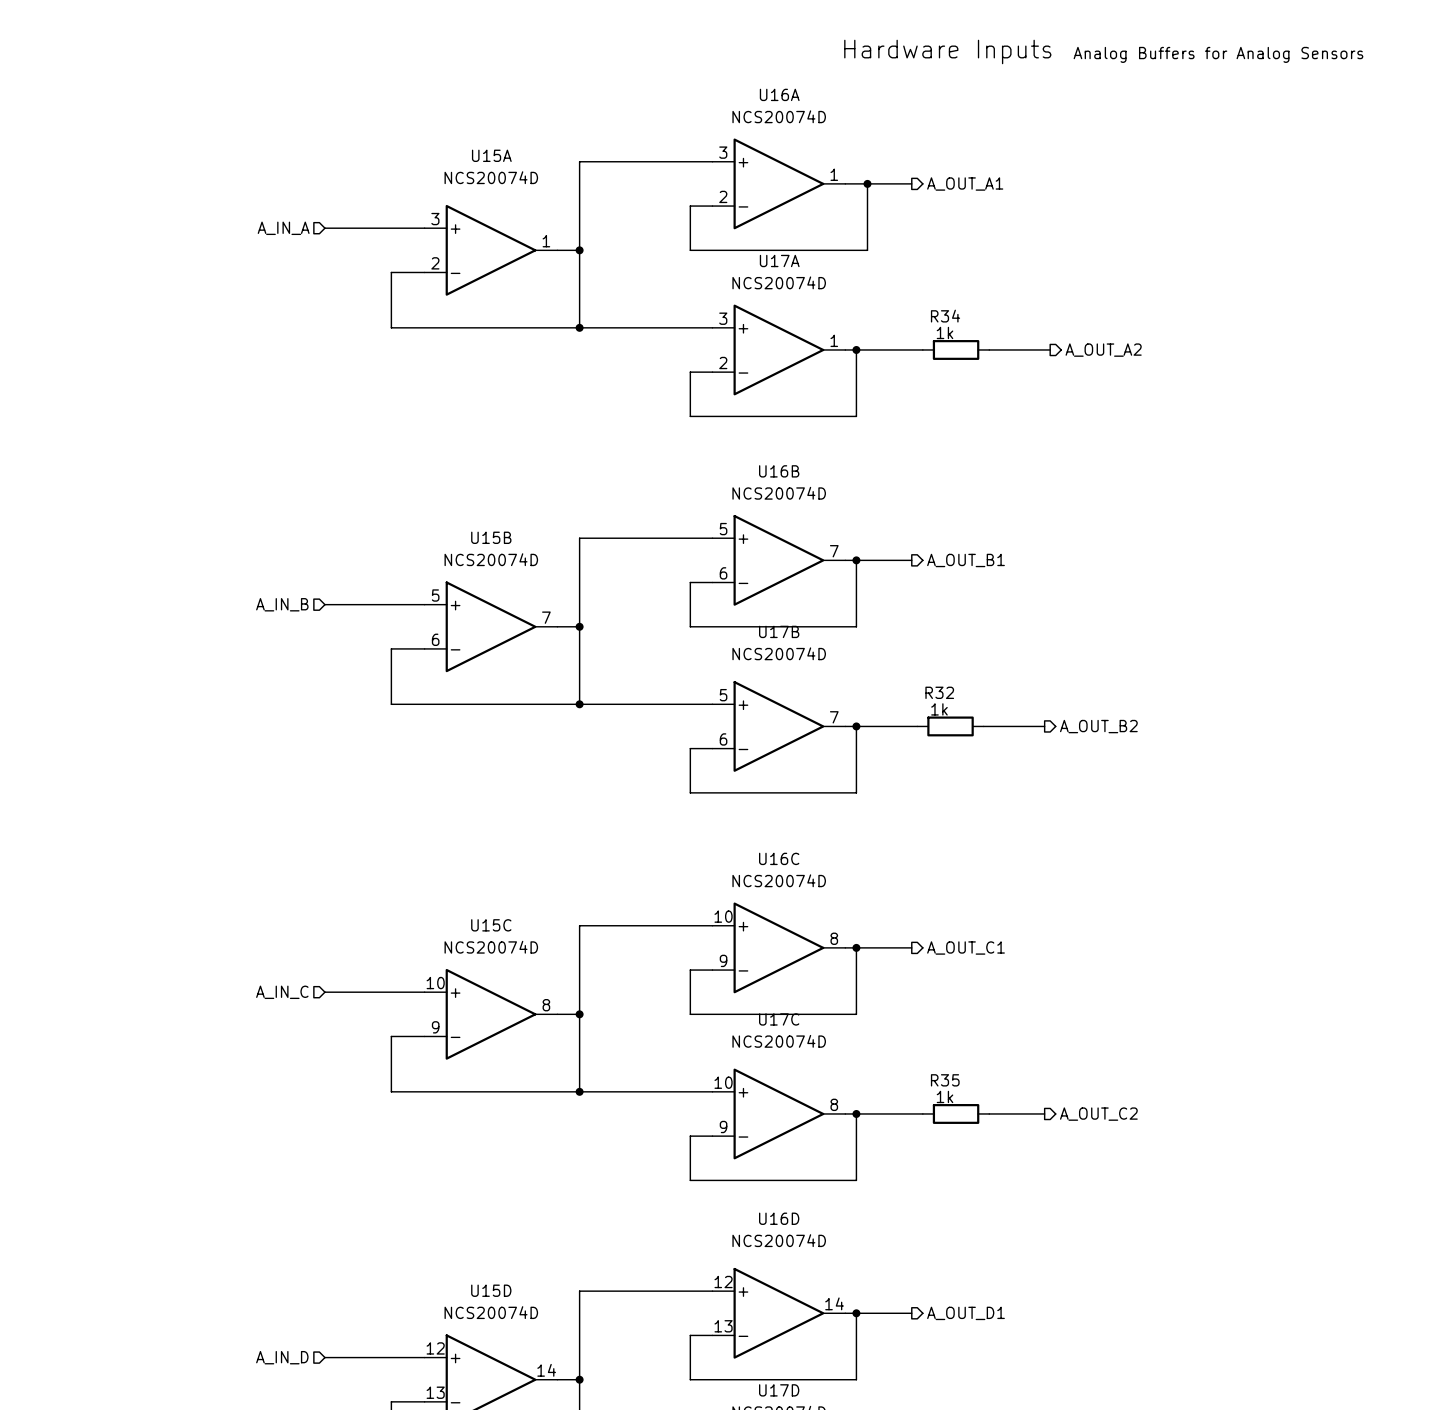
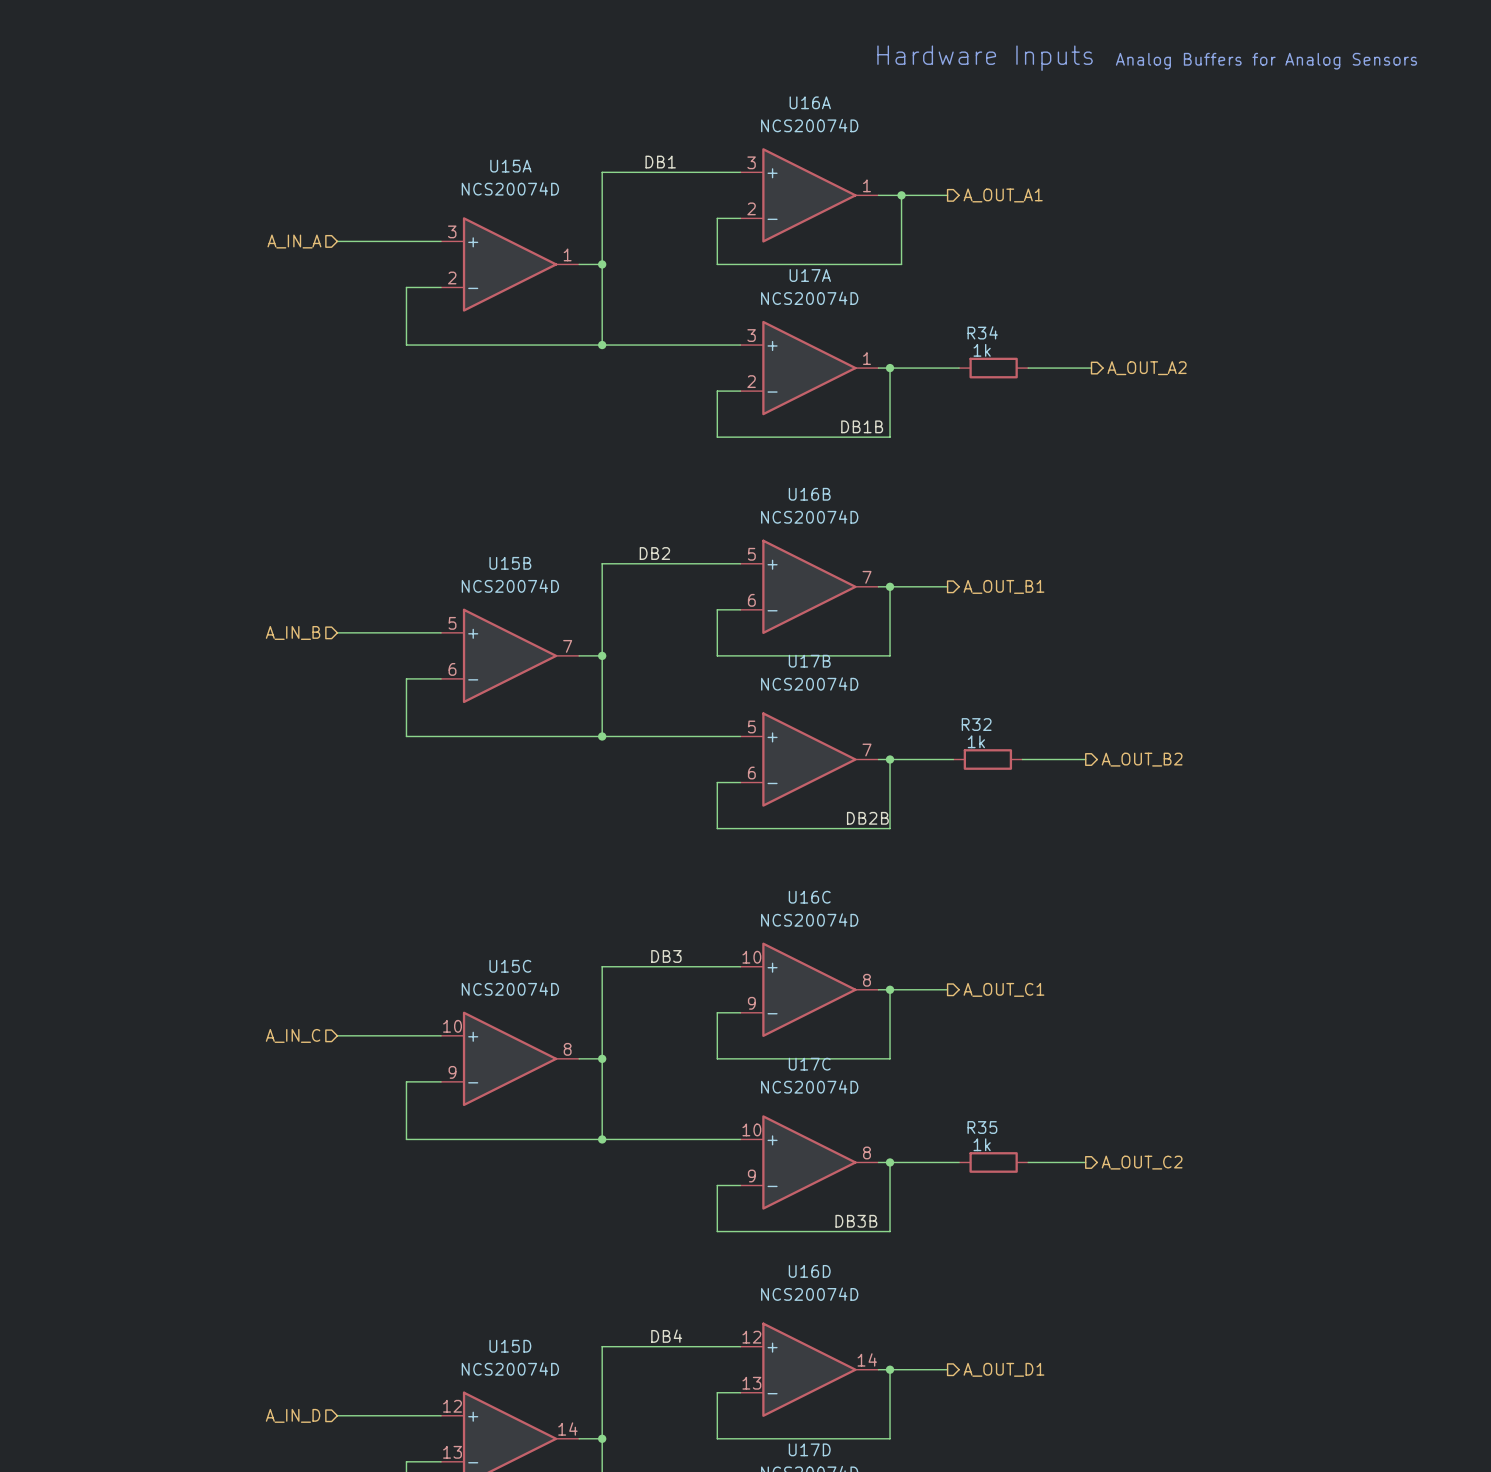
label: none -> DB1 (660, 162)
label: none -> DB1B (862, 426)
label: none -> DB2 (654, 553)
label: none -> DB2B (867, 818)
label: none -> DB3 (666, 956)
label: none -> DB3B (856, 1221)
label: none -> DB4 (666, 1336)

